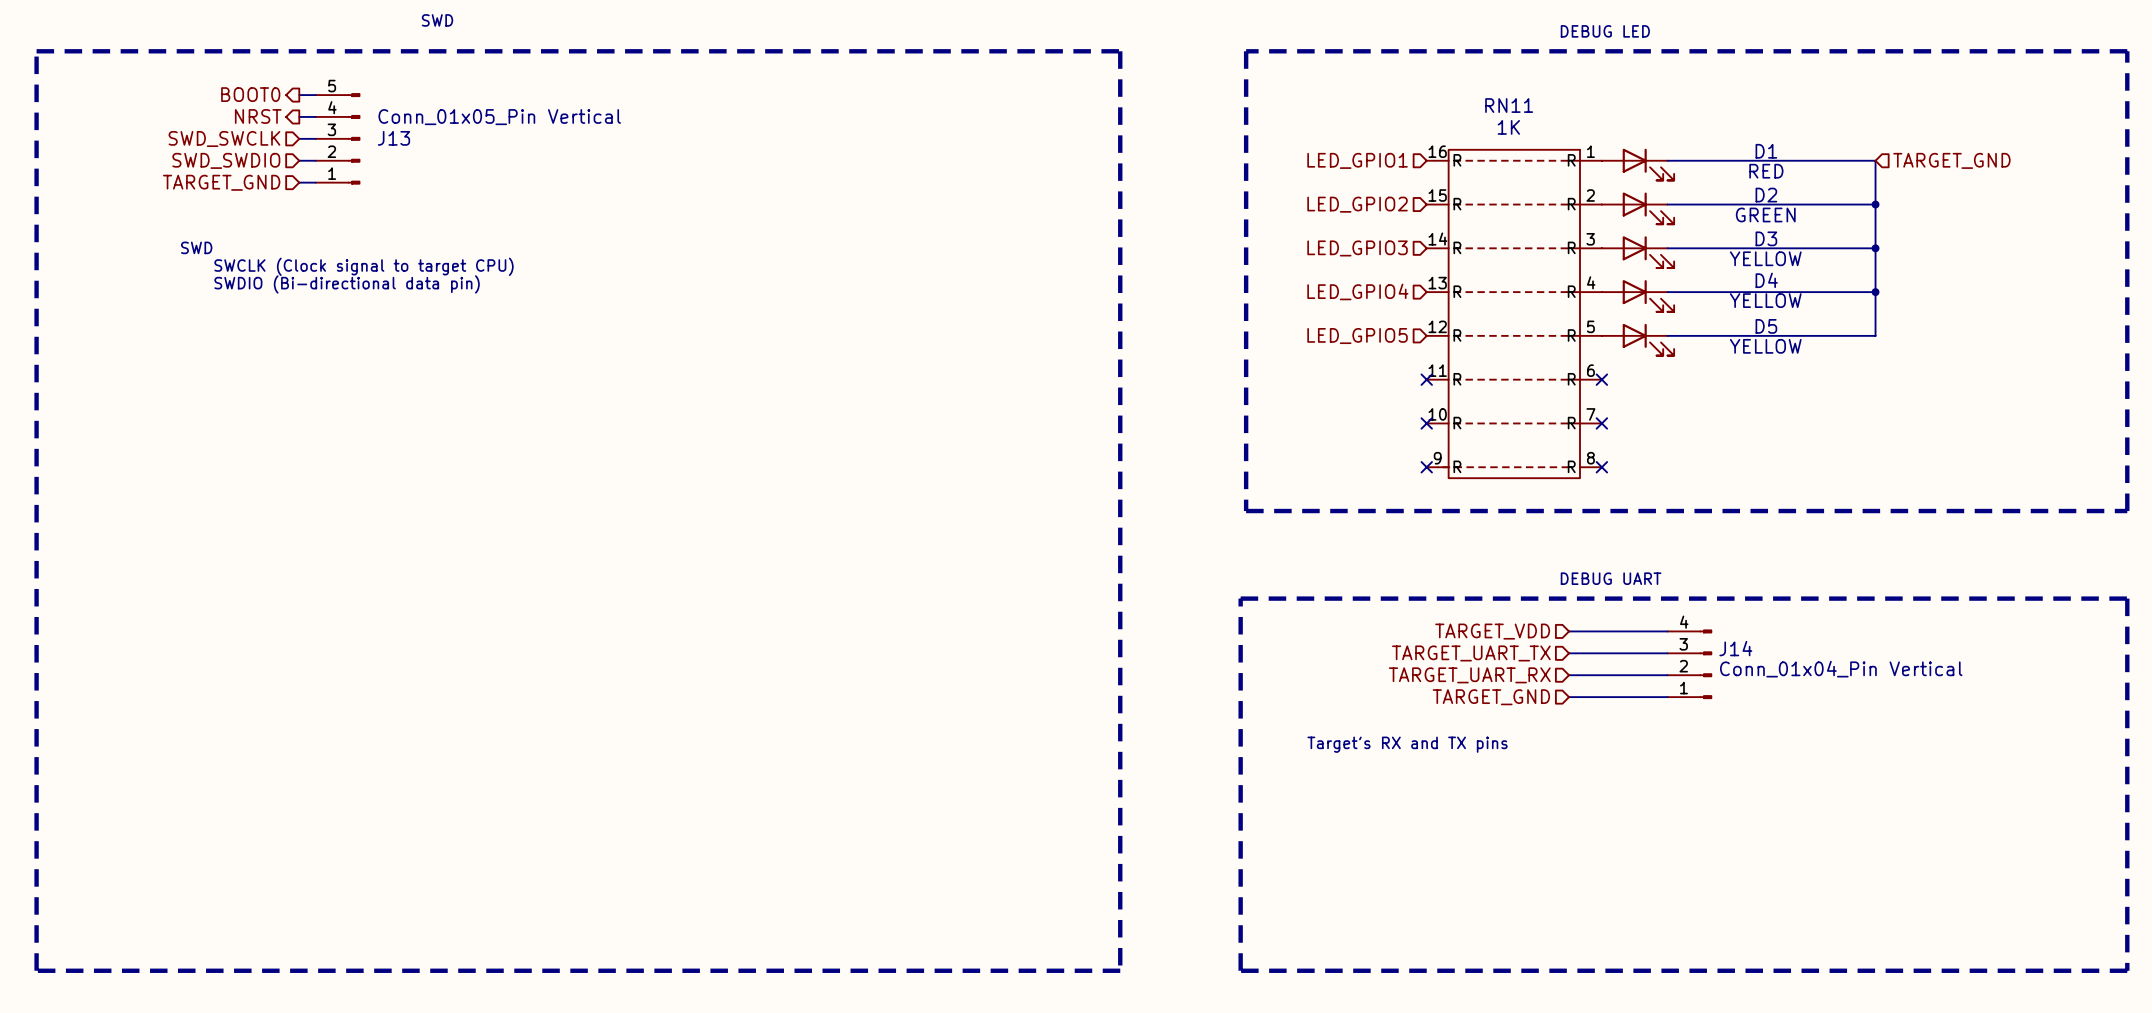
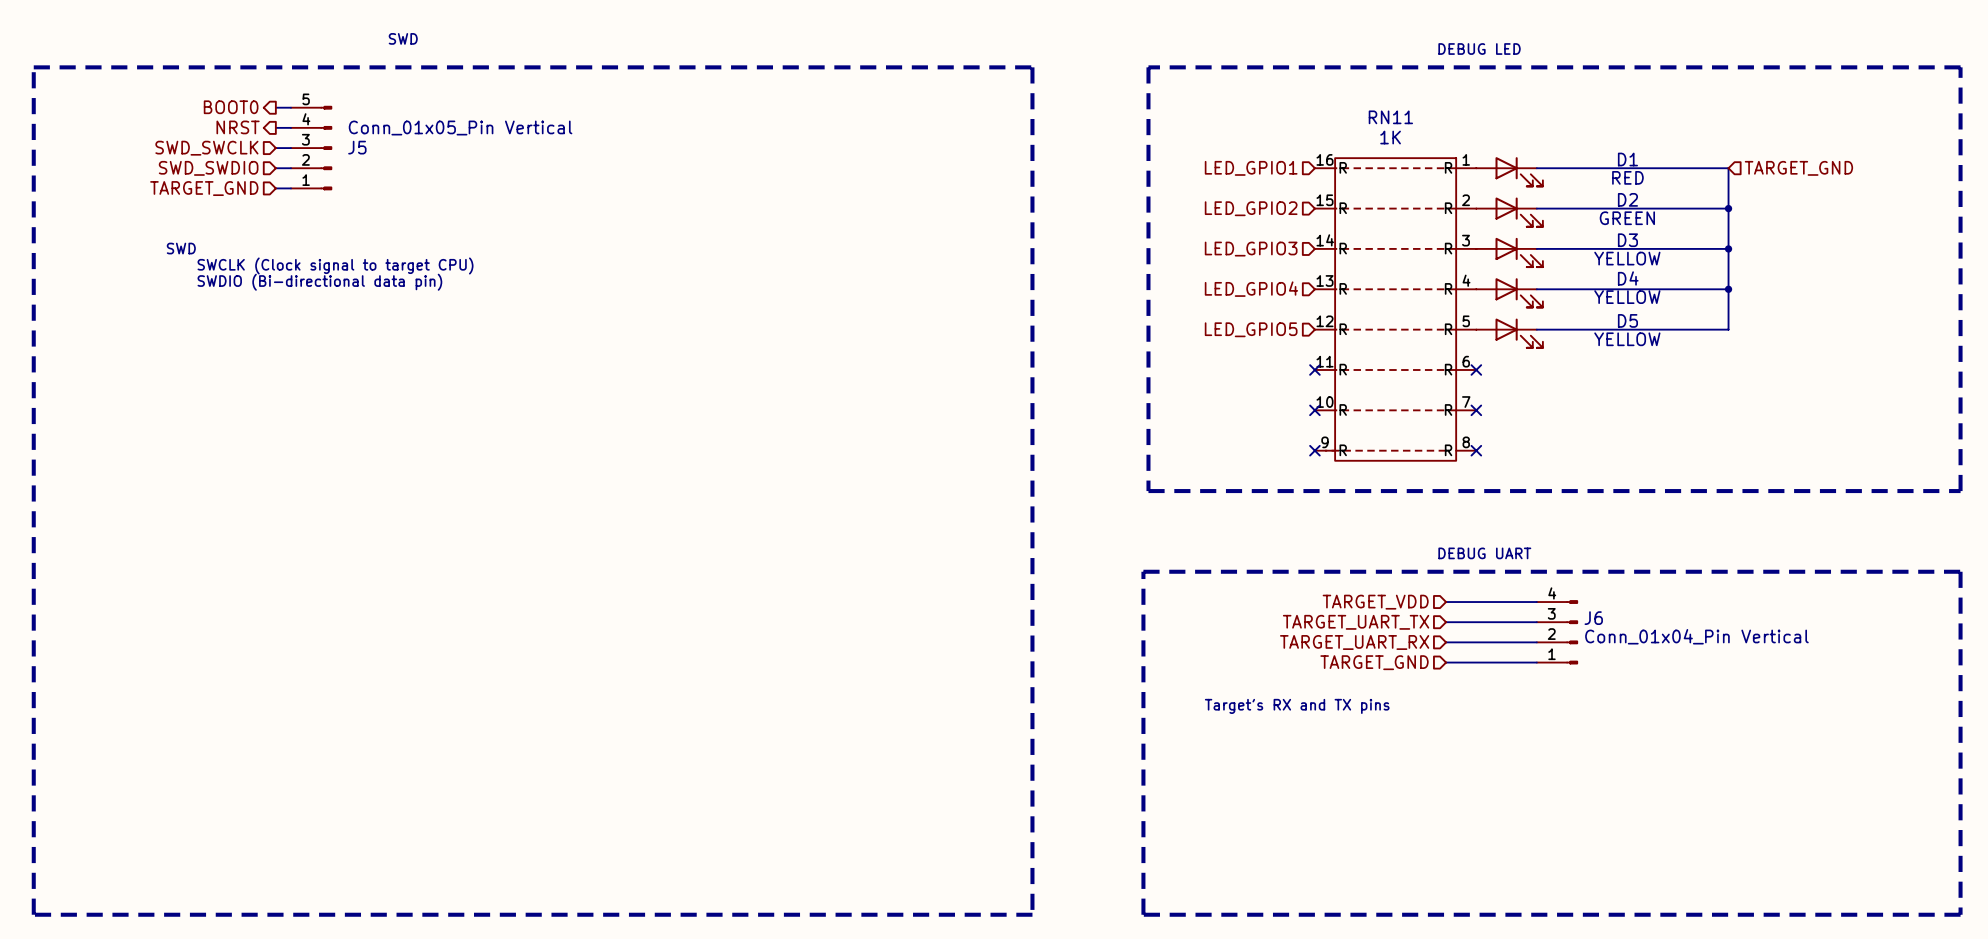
J13 name: J13 (393, 138) -> J5 (357, 147)
J14 name: J14 (1735, 648) -> J6 (1593, 618)

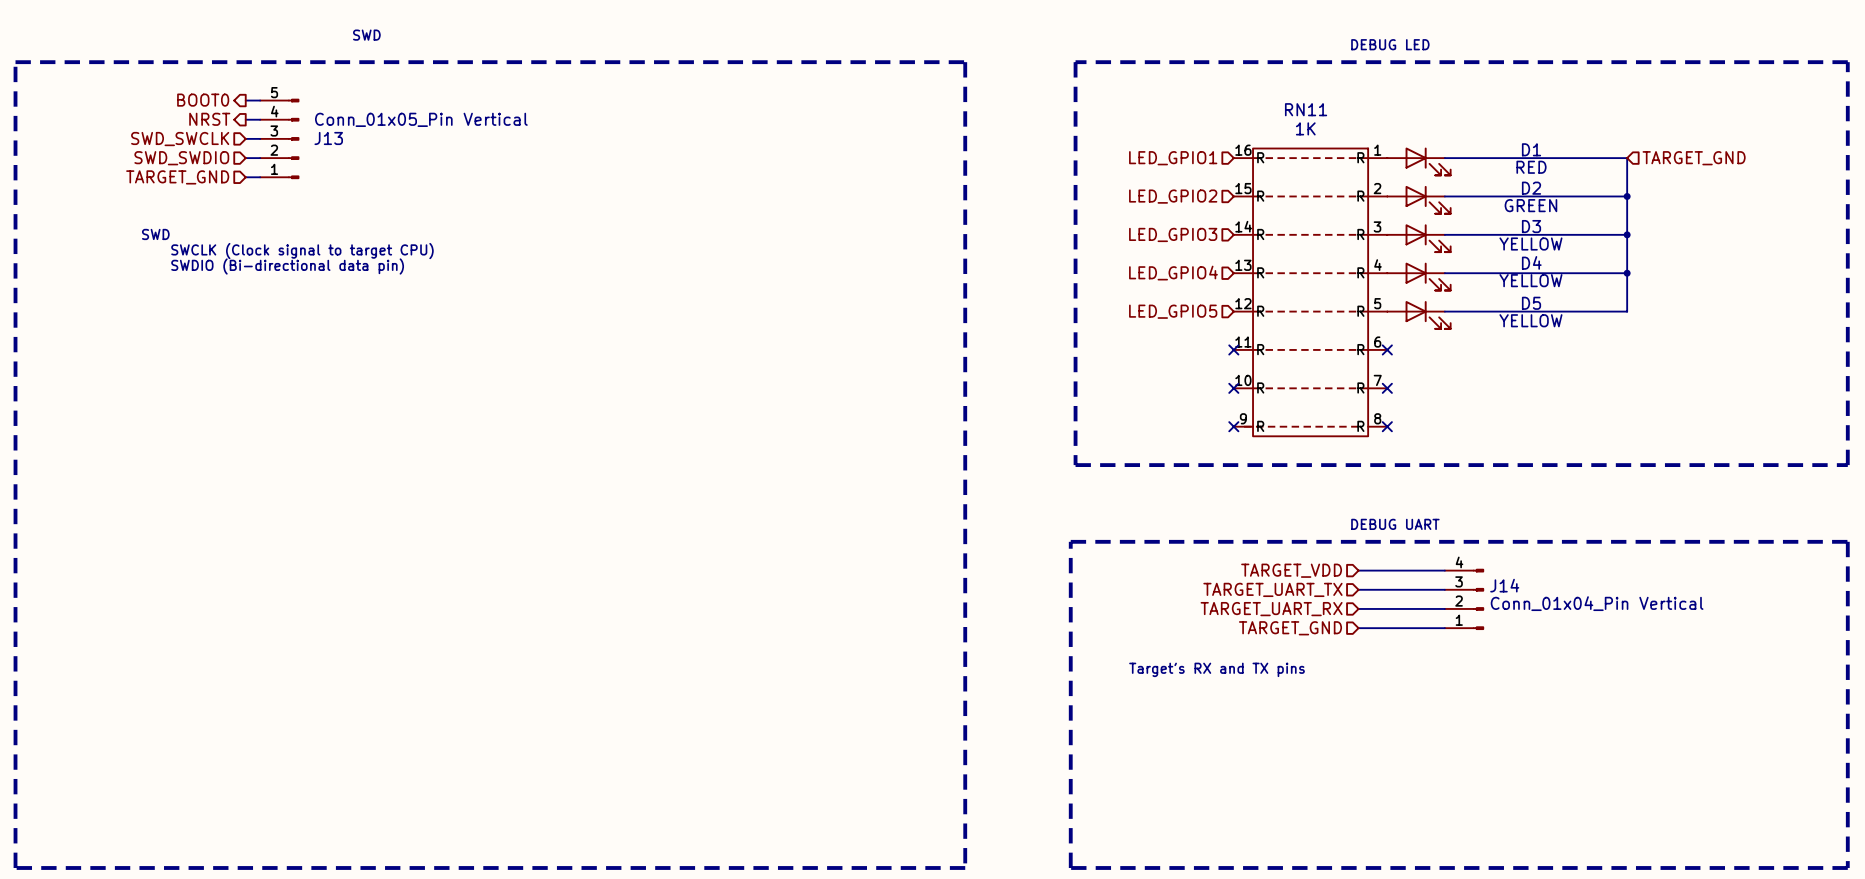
J5 name: J5 (357, 147) -> J13 (328, 138)
J6 name: J6 (1593, 618) -> J14 (1504, 585)

